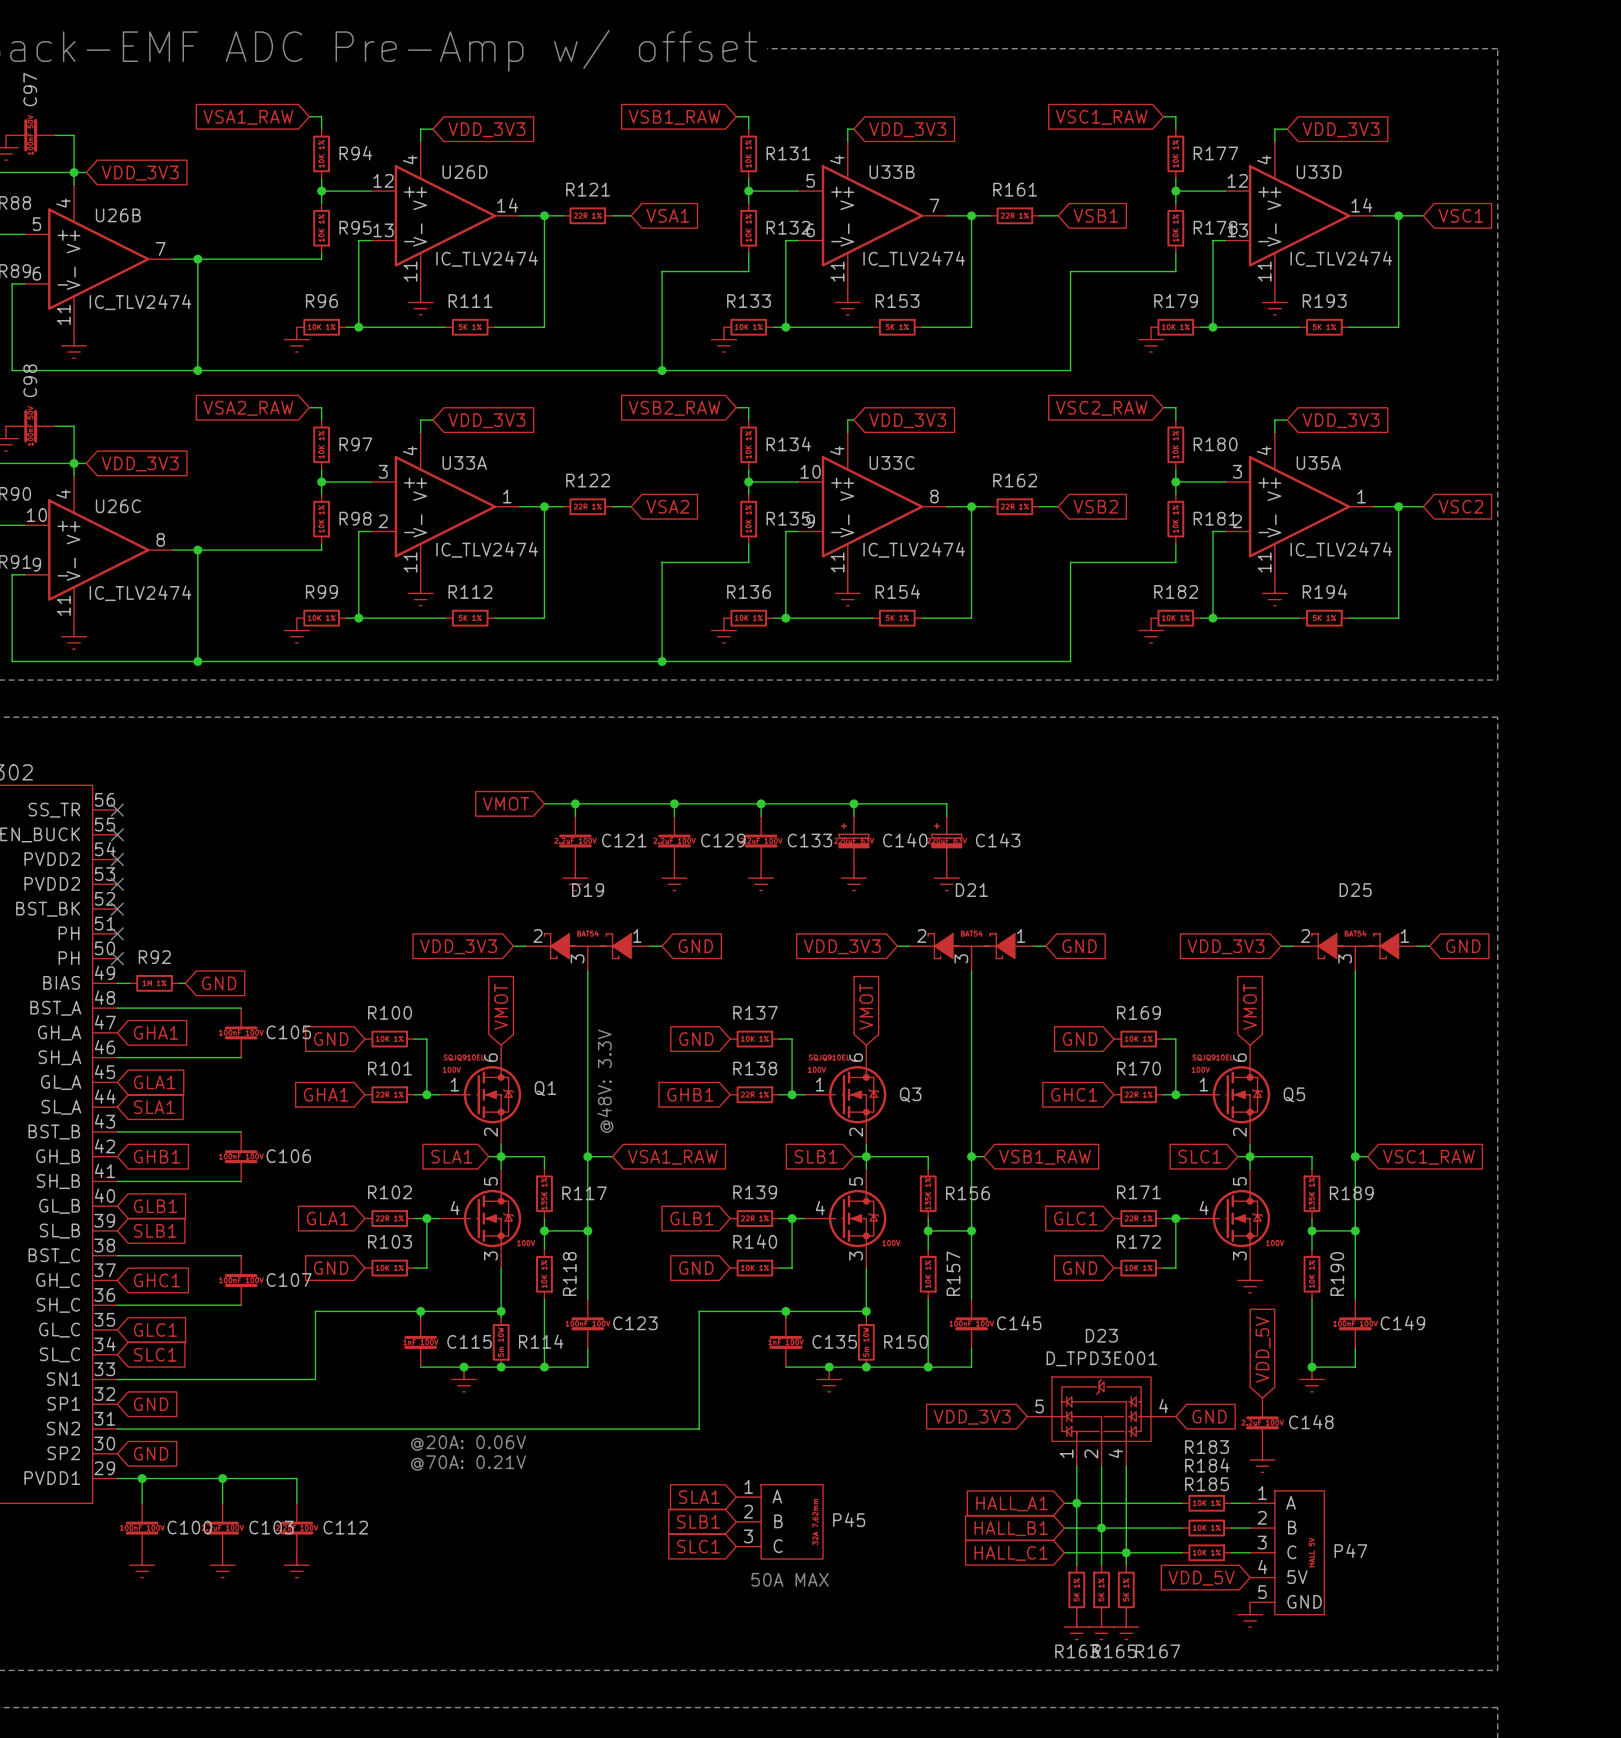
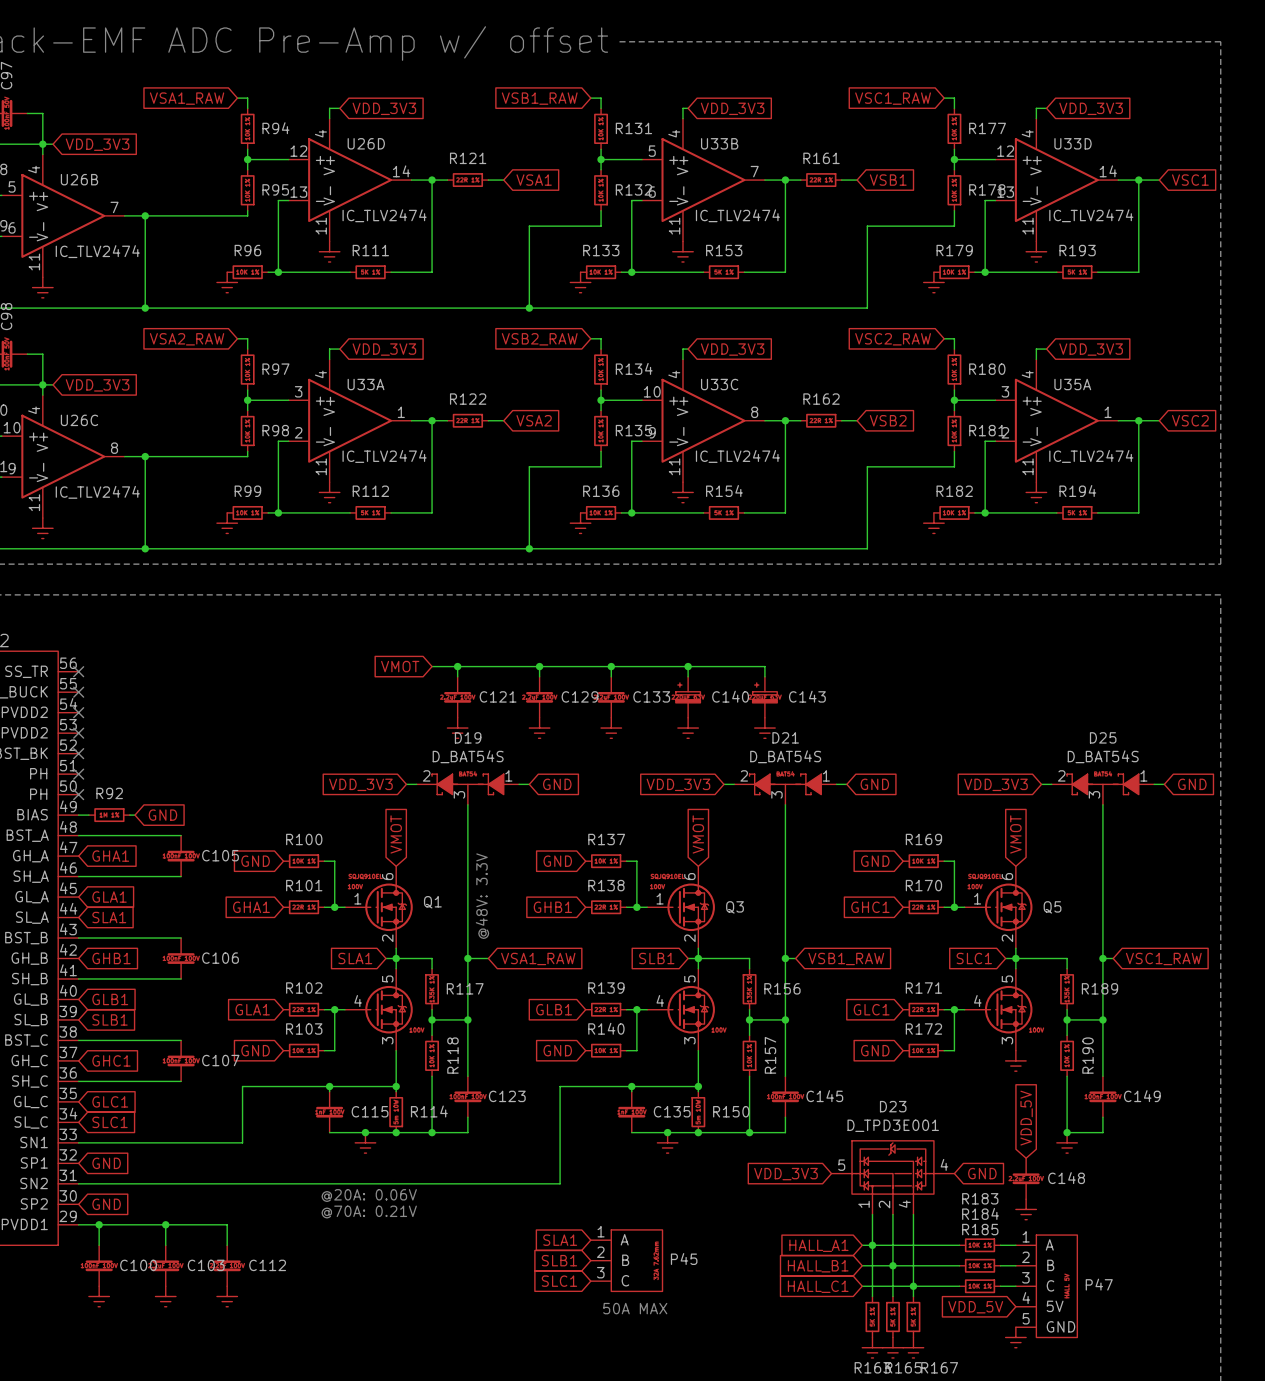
D19 value: none -> D_BAT54S (468, 756)
D21 value: none -> D_BAT54S (785, 756)
D25 value: none -> D_BAT54S (1103, 756)

